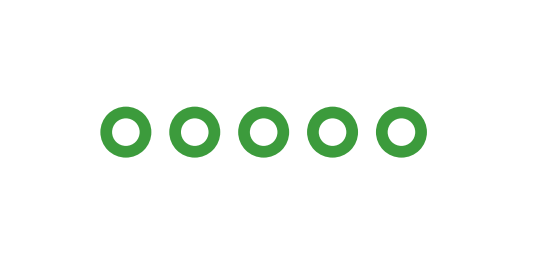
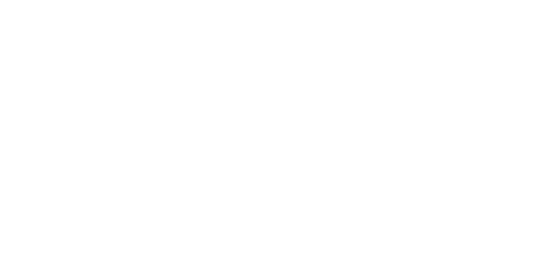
part: (263, 132) -> none

